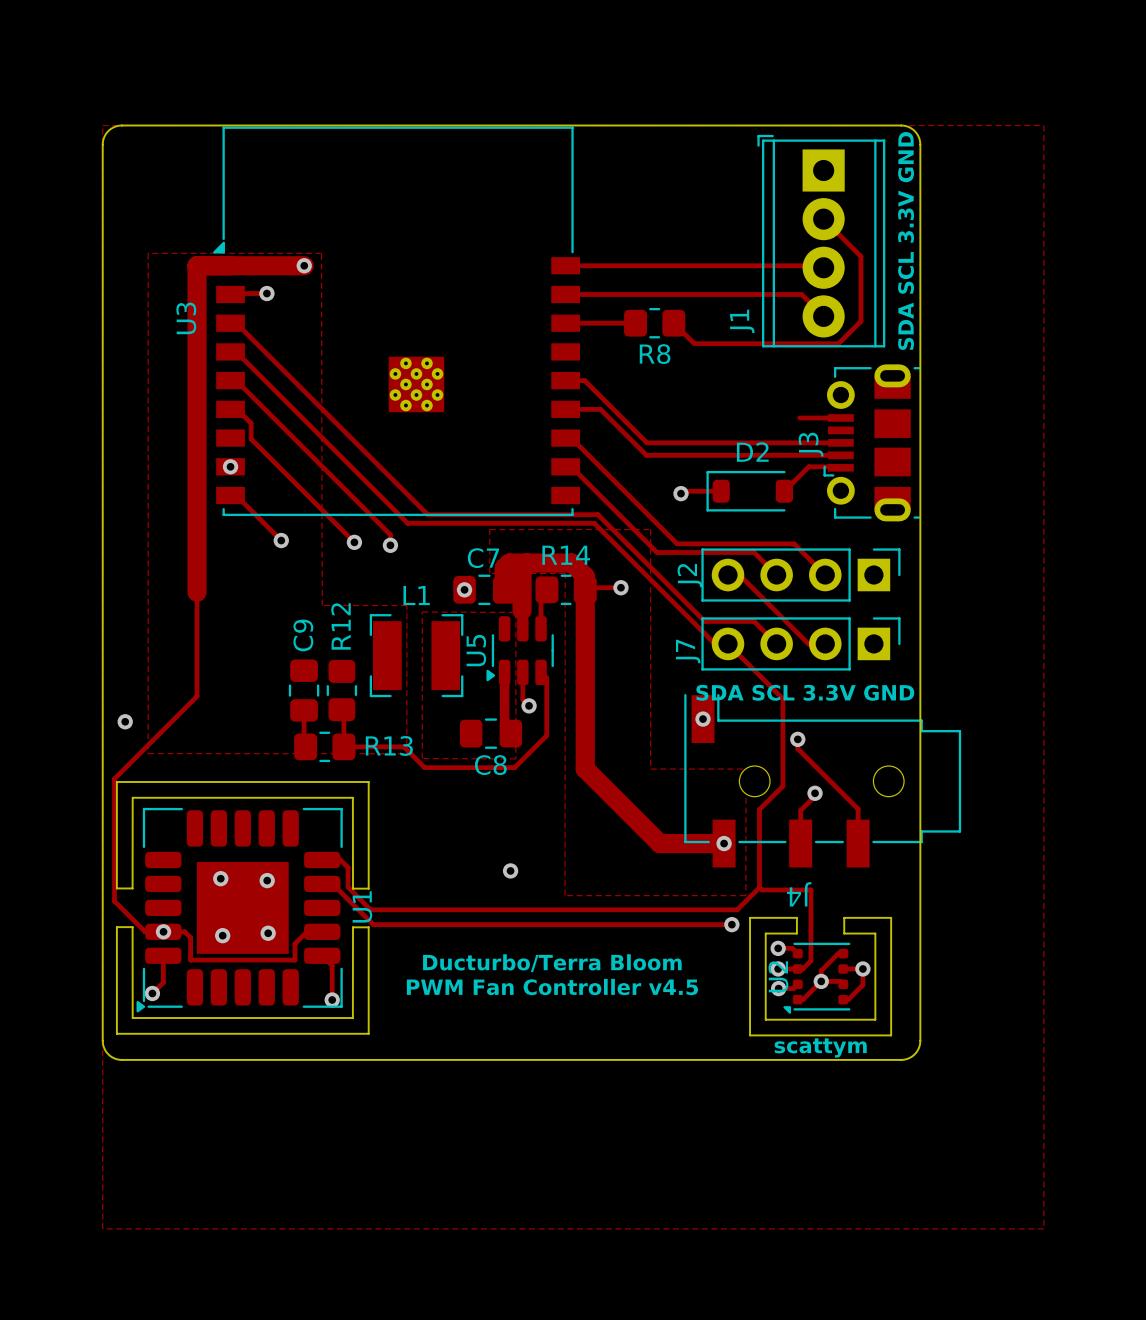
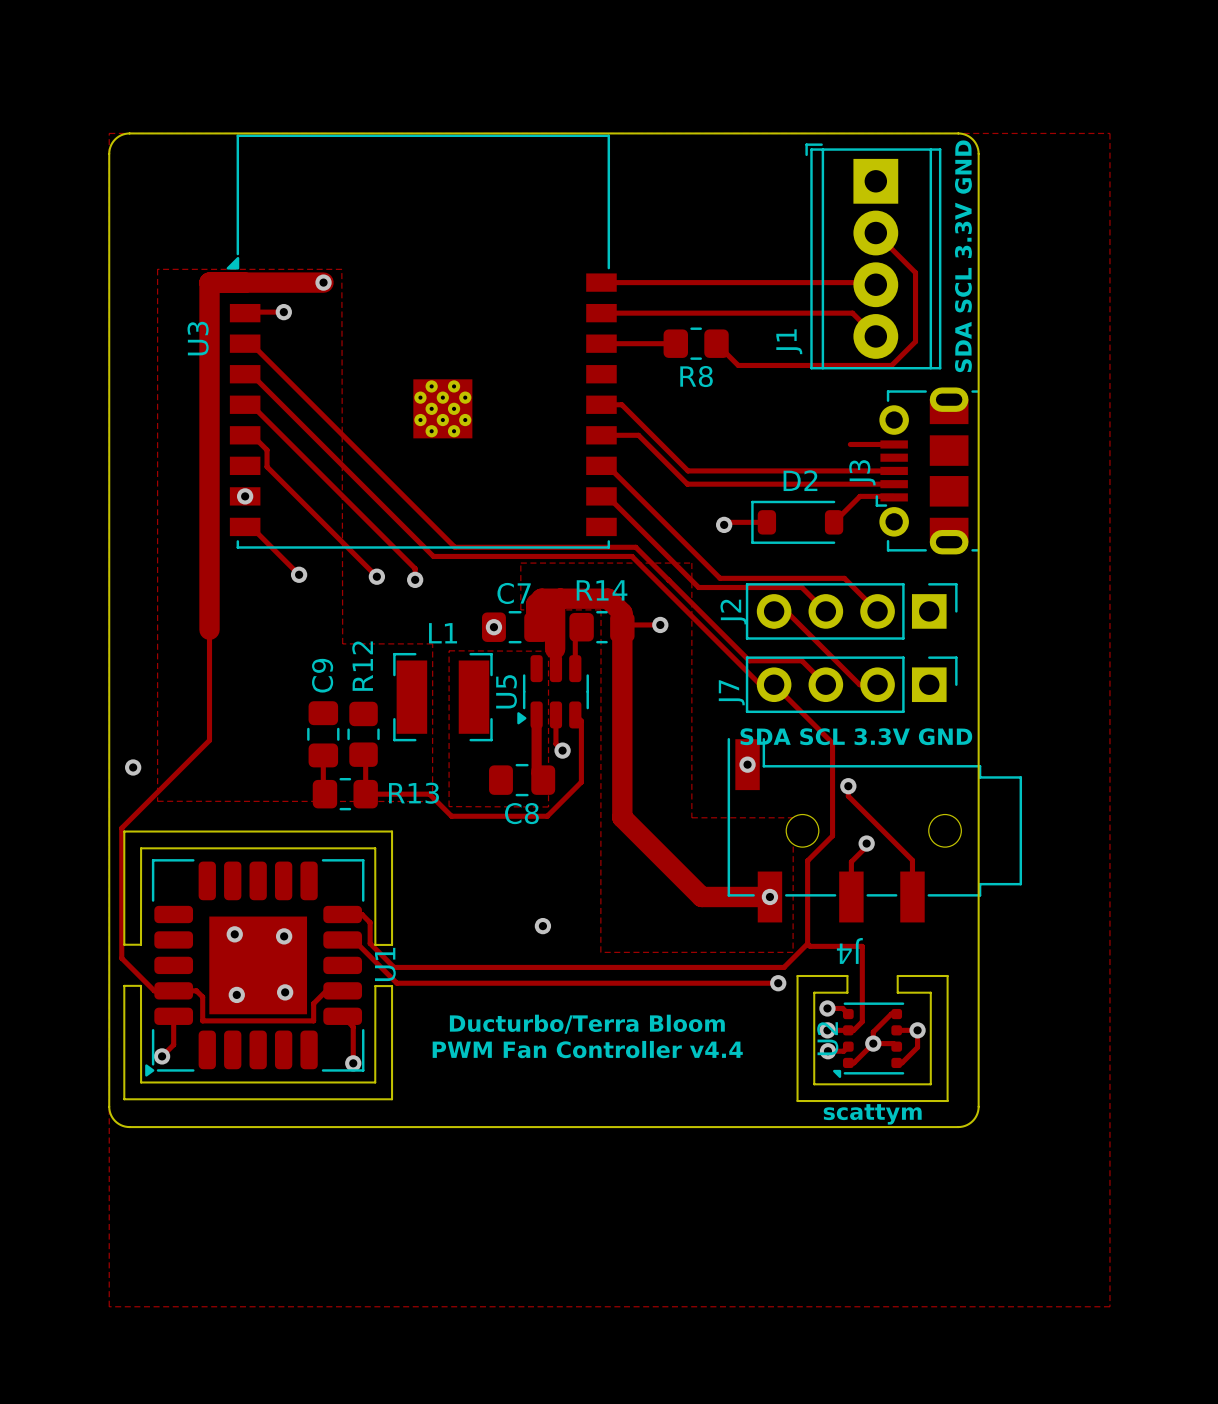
via: (163, 931) -> none
text: PWM Fan Controller v4.5 (552, 987) -> PWM Fan Controller v4.4 (587, 1049)

